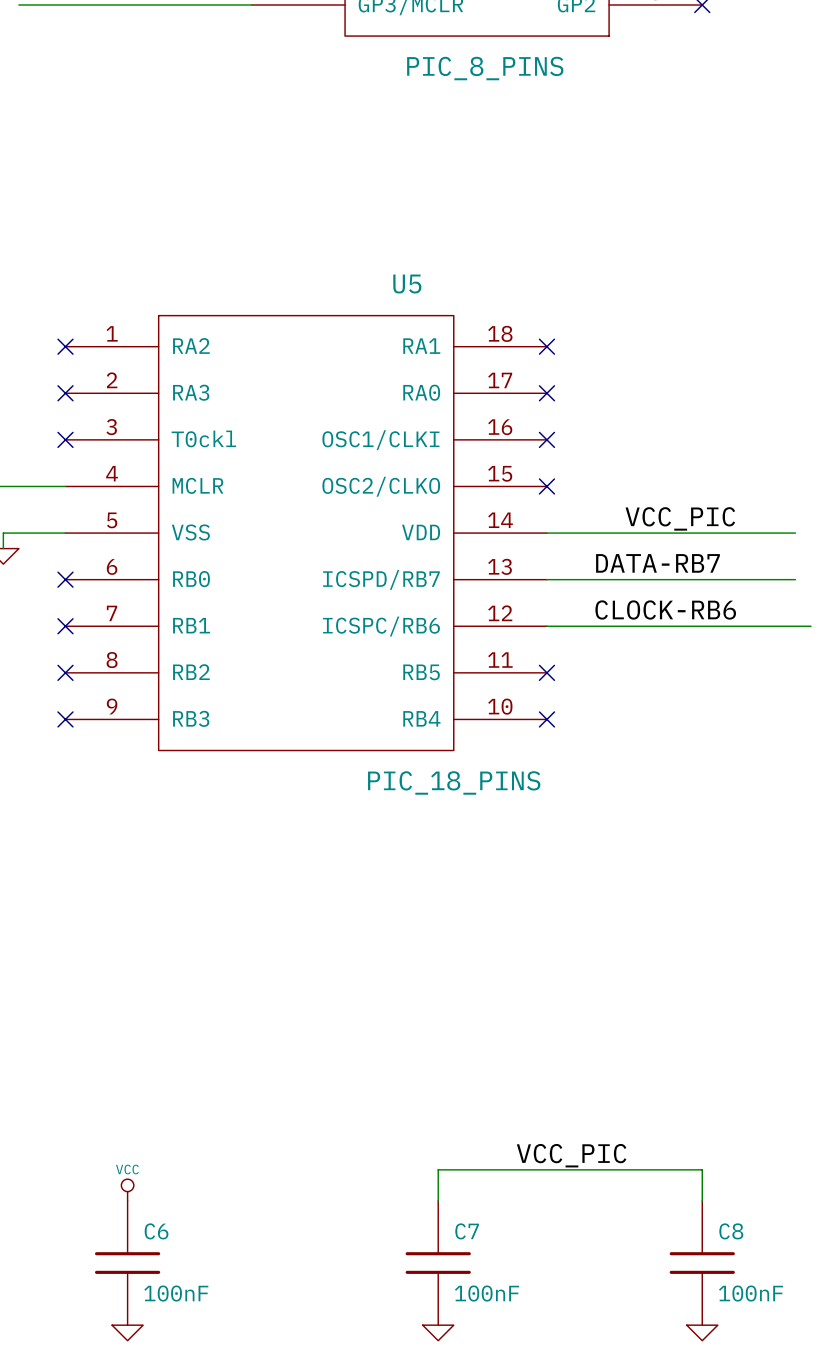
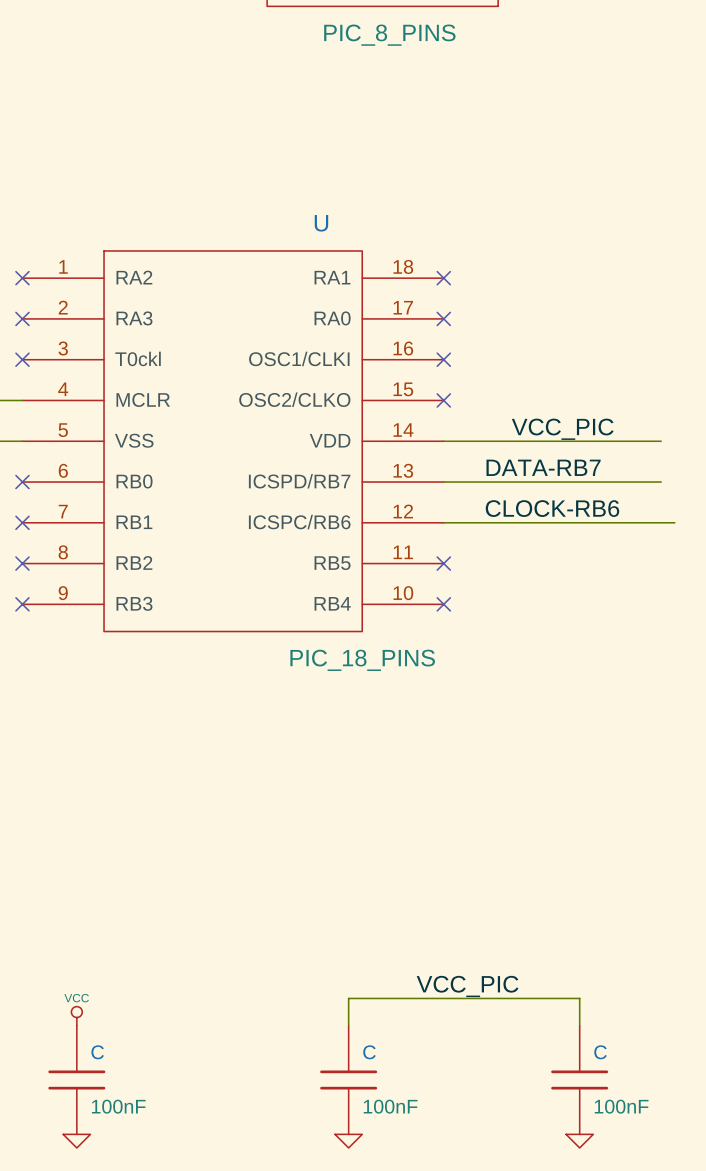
U5 name: U5 (407, 284) -> U (321, 223)
C6 name: C6 (156, 1231) -> C (97, 1052)
C7 name: C7 (467, 1231) -> C (369, 1052)
C8 name: C8 (731, 1231) -> C (600, 1052)

